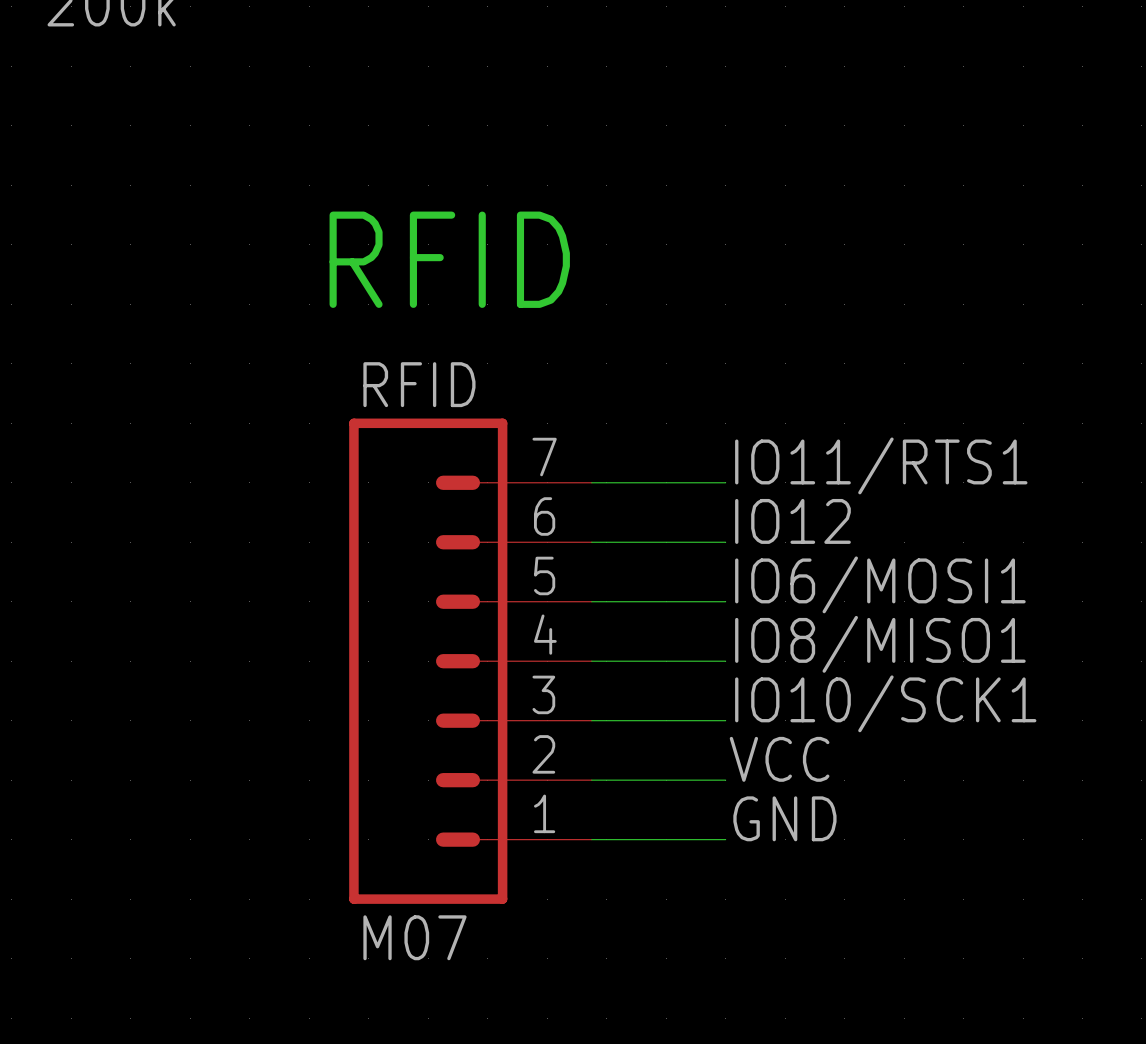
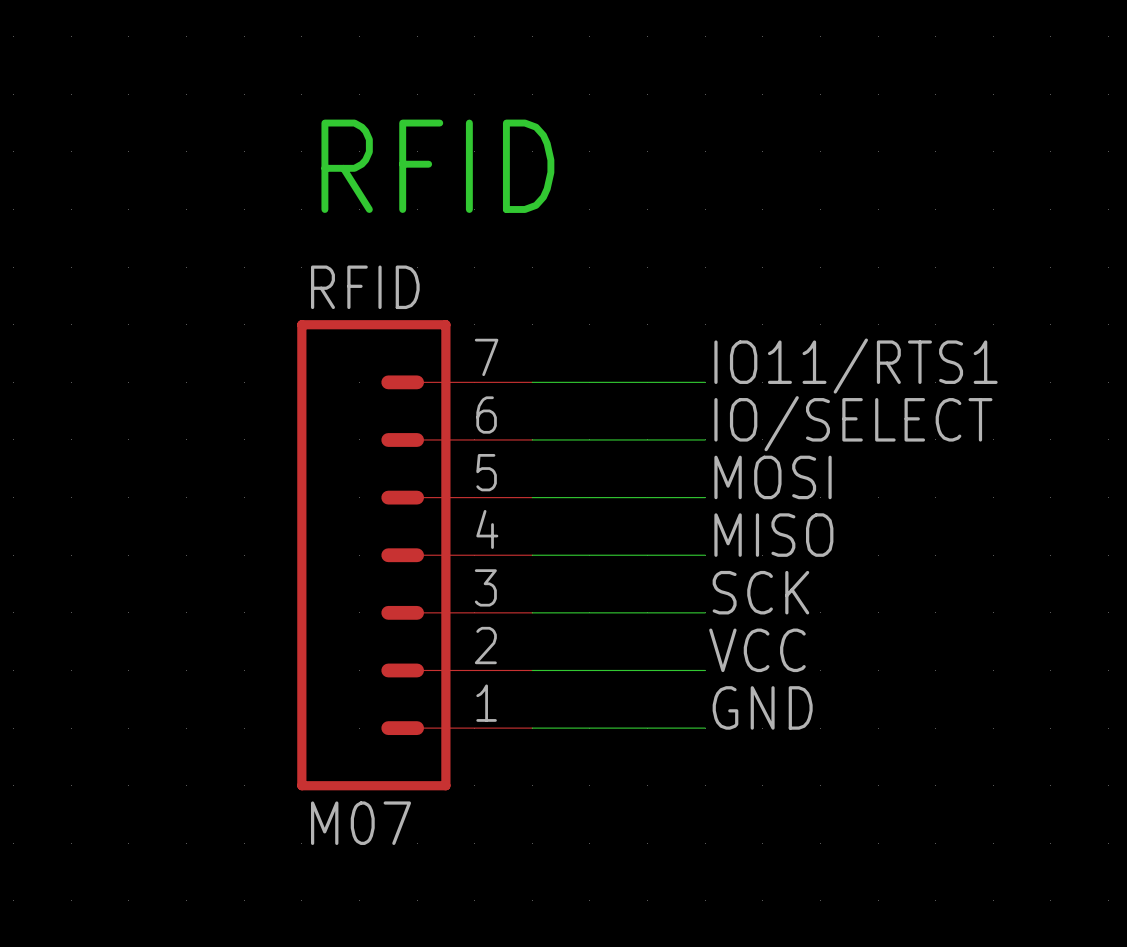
label: IO12 (792, 521) -> IO/SELECT (853, 423)
label: IO6/MOSI1 (880, 584) -> MOSI (773, 477)
label: IO8/MISO1 (880, 644) -> MISO (773, 535)
RFID position: (470, 661) -> (414, 555)
label: IO10/SCK1 (885, 703) -> SCK (760, 592)

